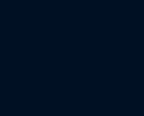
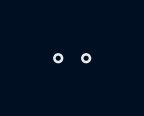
via: none -> (58, 58)
via: none -> (86, 58)

